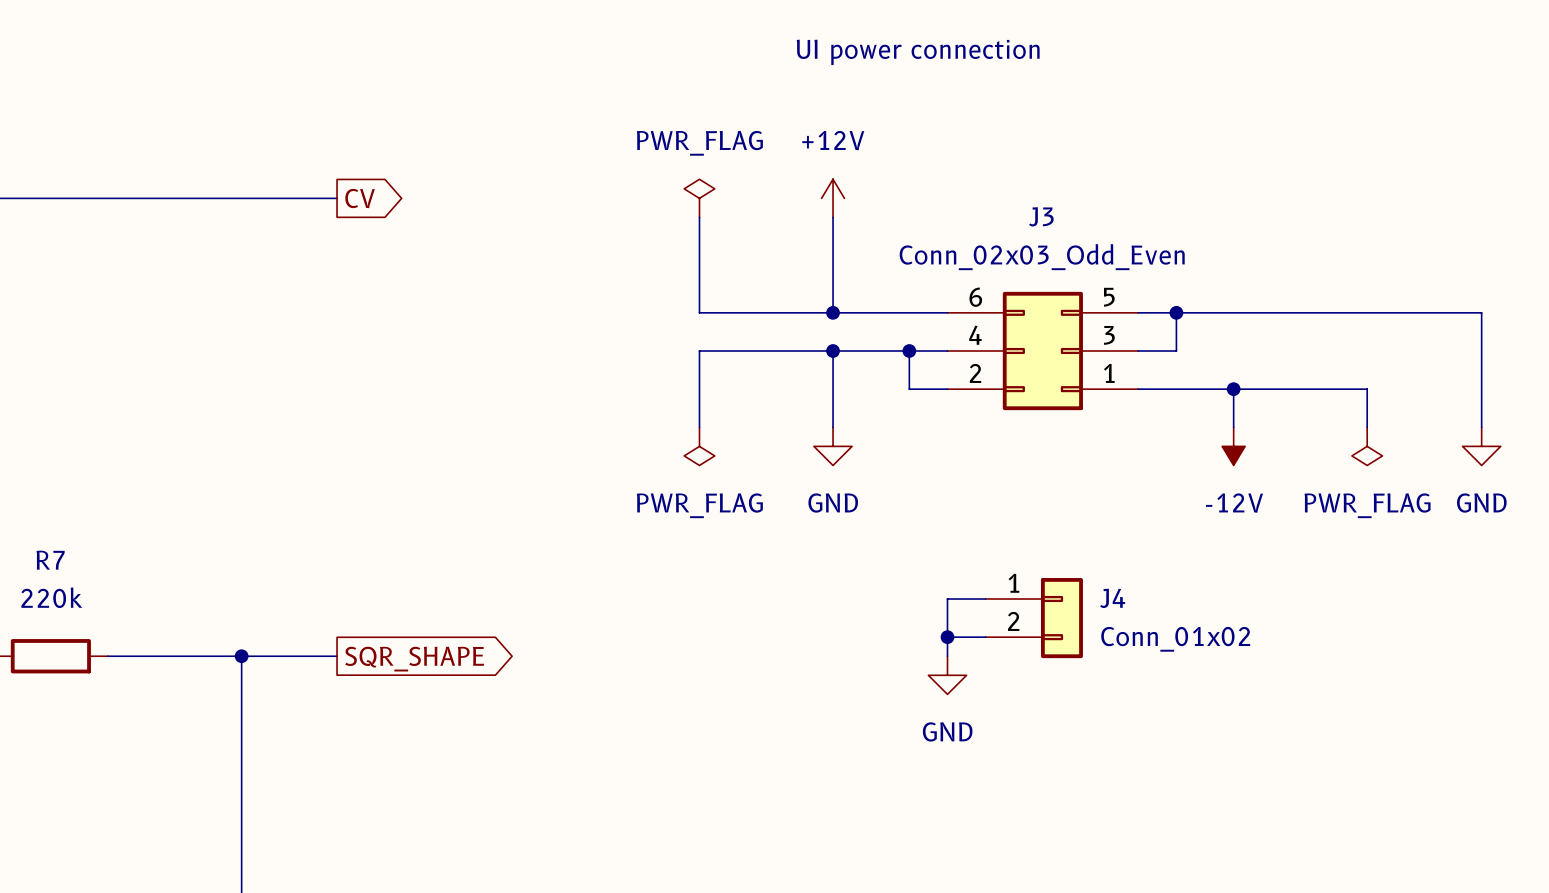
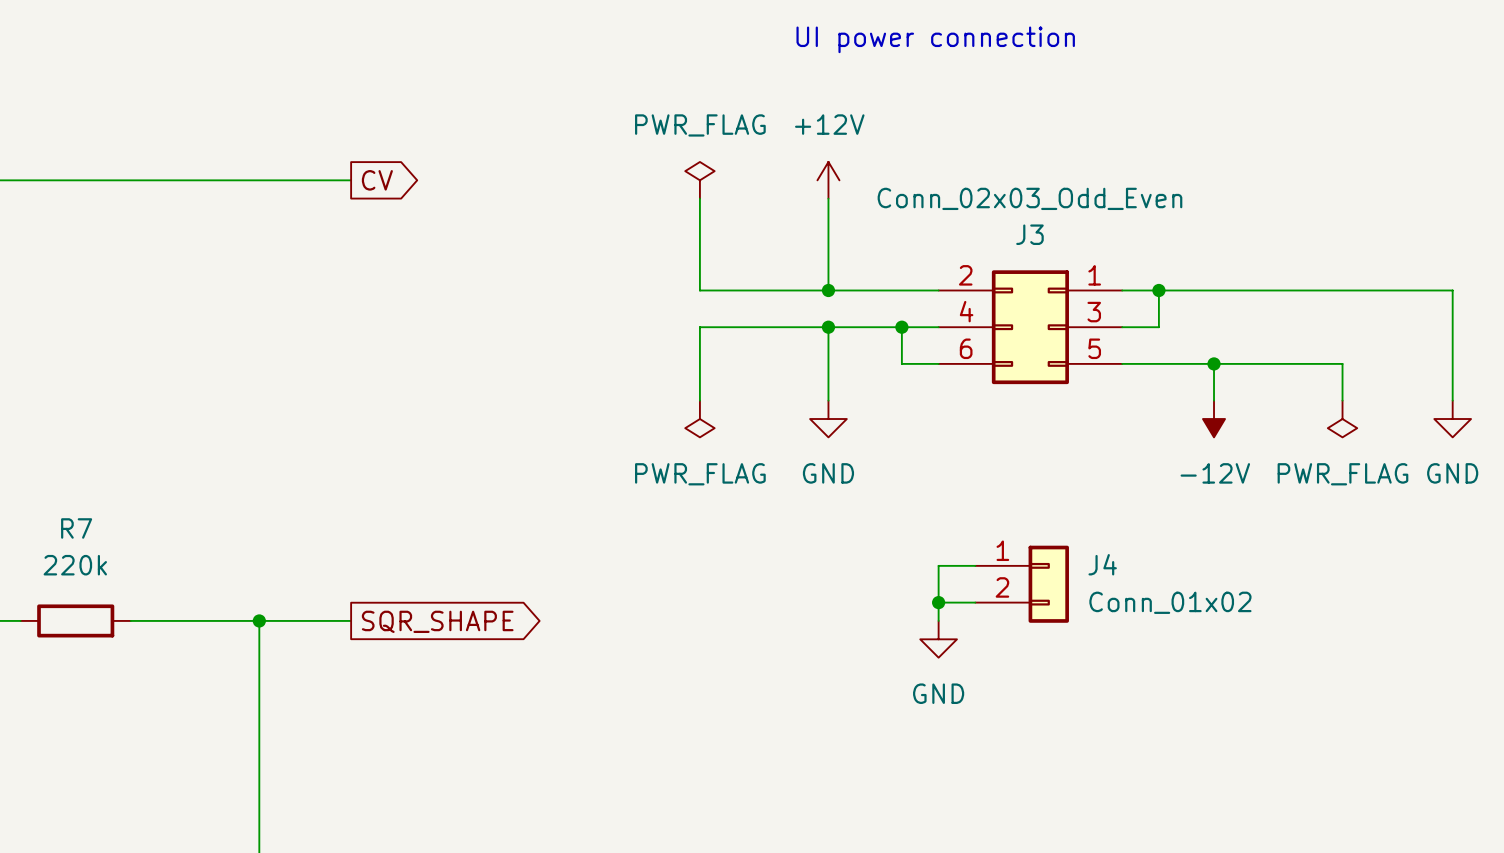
J3 name position: J3 (1041, 216) -> J3 (1029, 234)
J3 value position: Conn_02x03_Odd_Even (1042, 257) -> Conn_02x03_Odd_Even (1029, 198)
J3 flip: as is (1042, 351) -> up-down (1030, 327)

